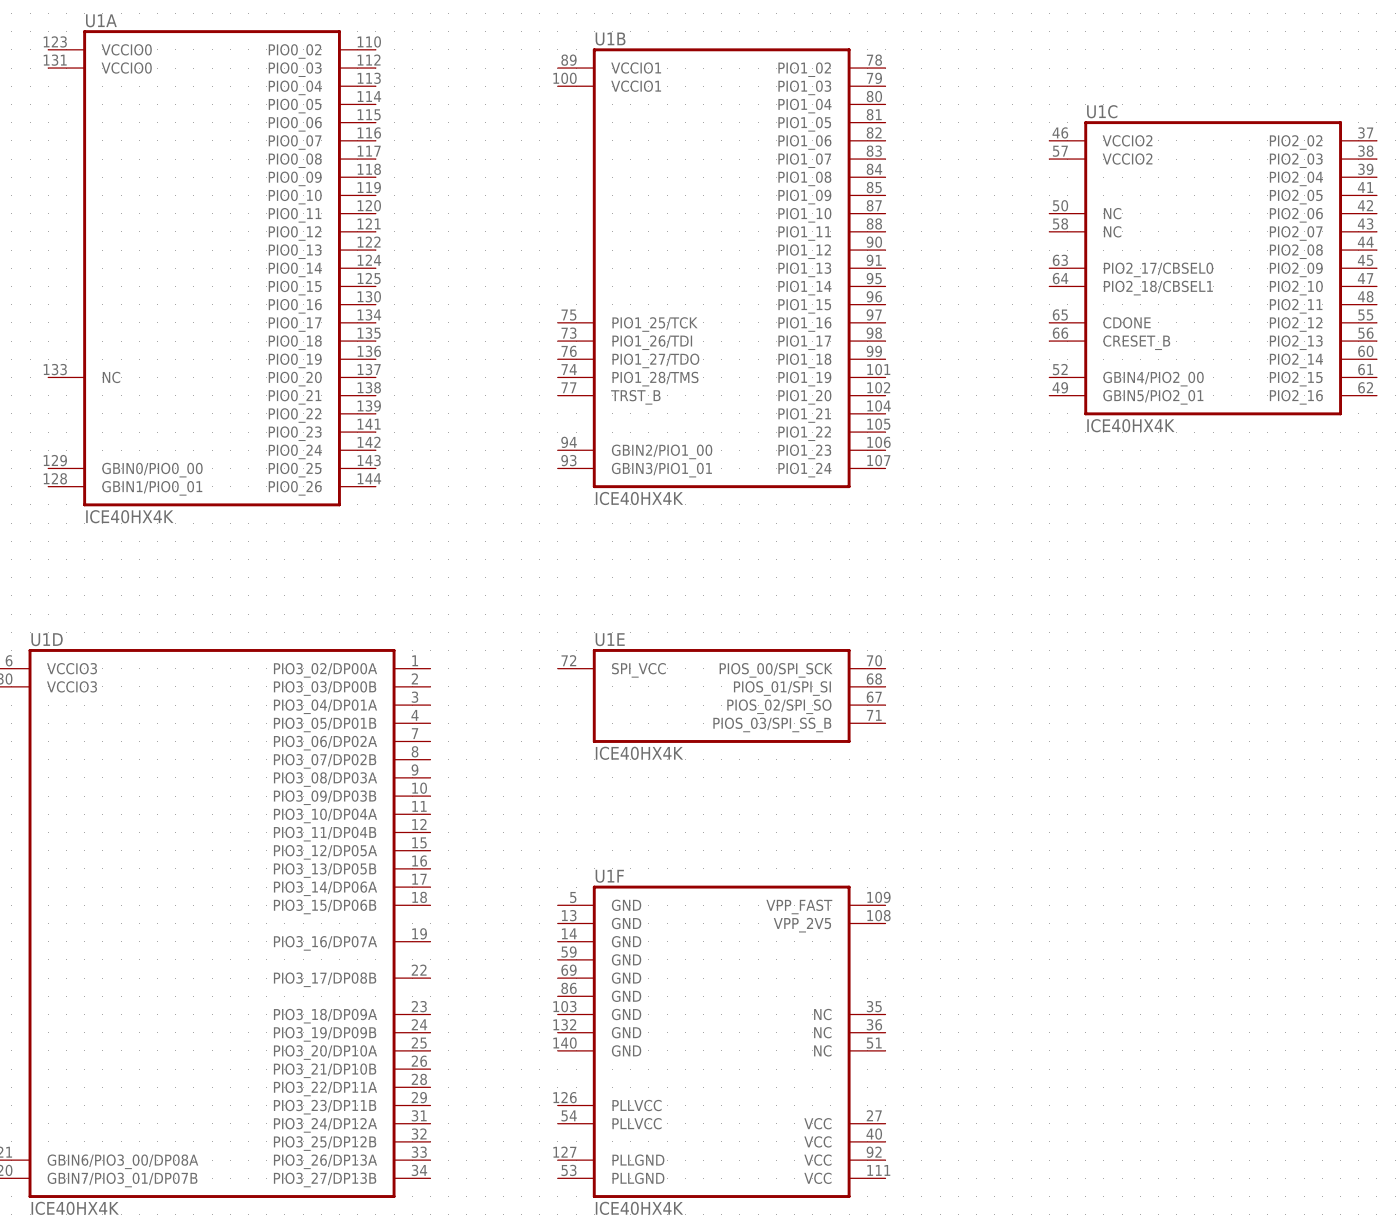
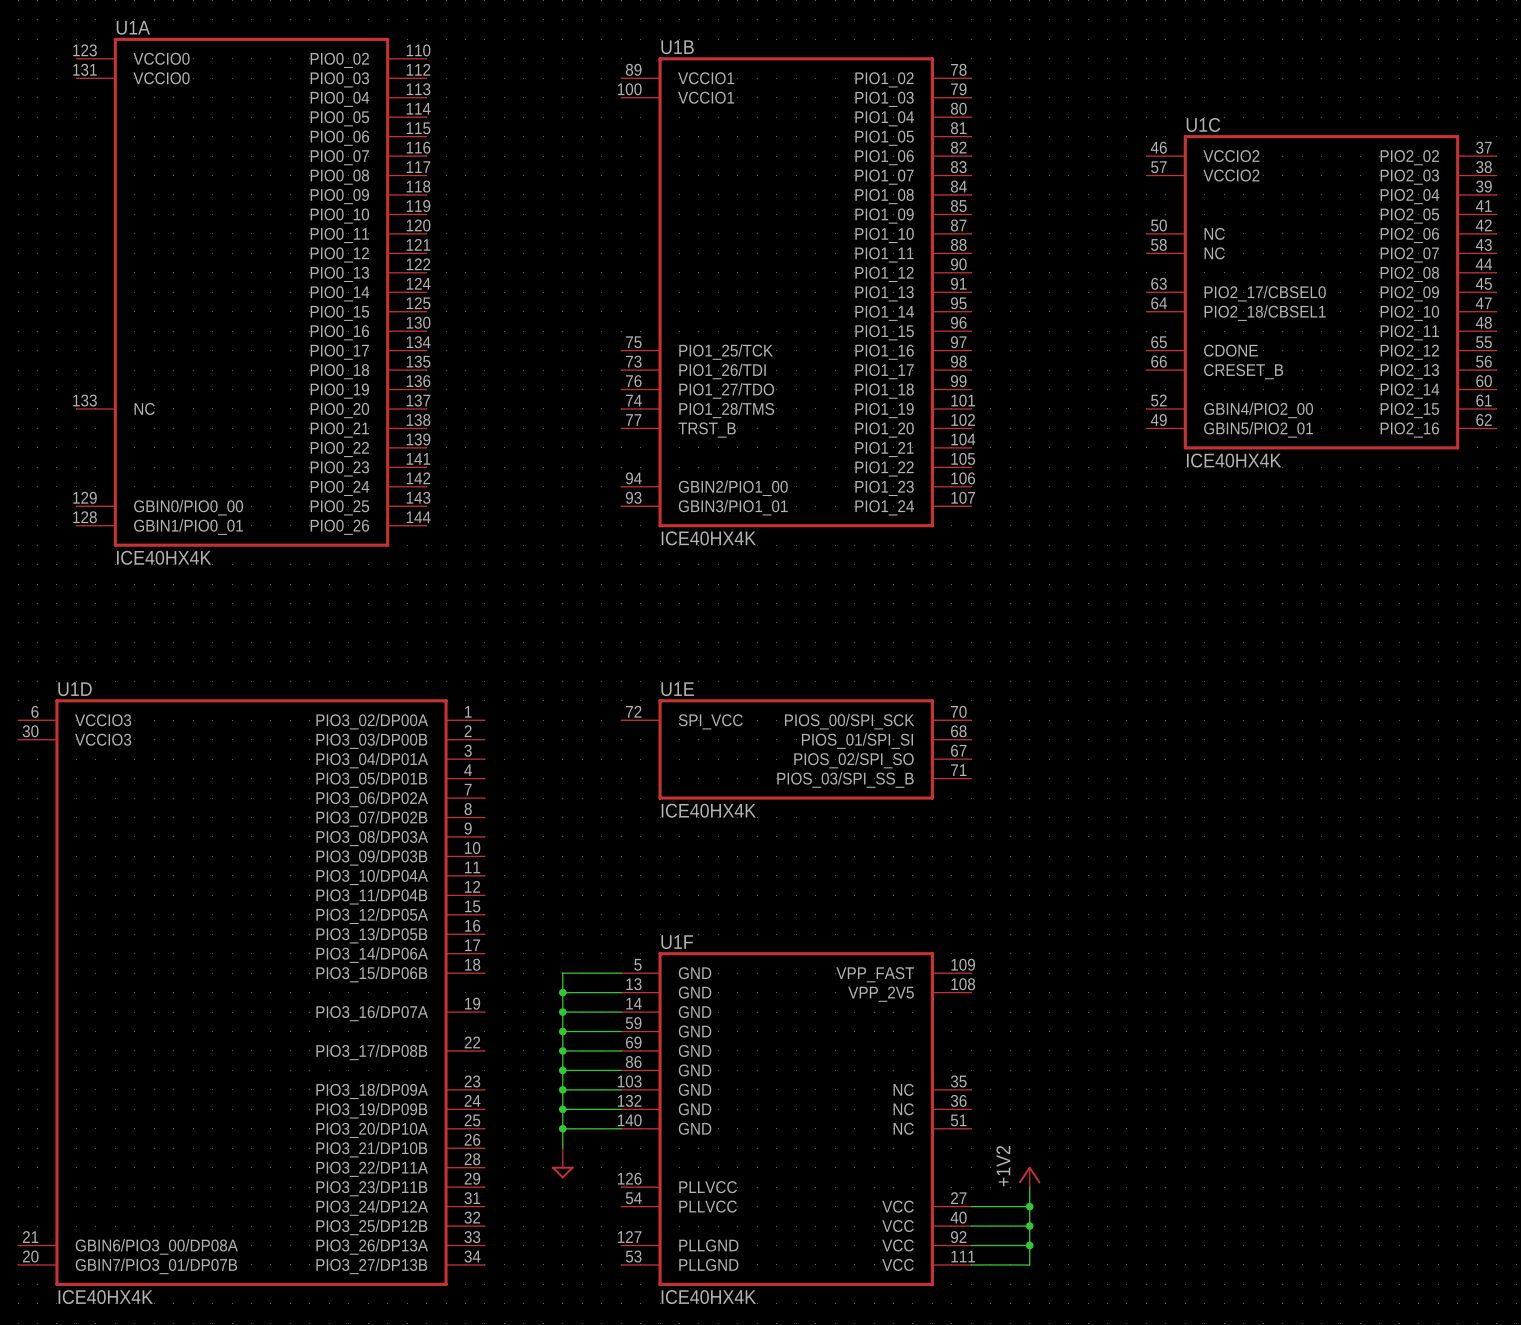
wire: none -> (621, 973) (562, 973) (562, 1148)
wire: none -> (562, 992) (621, 992)
junction: none -> (562, 992)
wire: none -> (562, 1012) (621, 1012)
junction: none -> (562, 1012)
wire: none -> (562, 1031) (621, 1031)
junction: none -> (562, 1031)
wire: none -> (562, 1050) (621, 1050)
junction: none -> (562, 1050)
wire: none -> (562, 1070) (621, 1070)
junction: none -> (562, 1070)
wire: none -> (562, 1089) (621, 1089)
junction: none -> (562, 1089)
wire: none -> (562, 1109) (621, 1109)
junction: none -> (562, 1109)
wire: none -> (562, 1128) (621, 1128)
junction: none -> (562, 1128)
power symbol: none -> (562, 1163)
power symbol: none -> +1V2 (1029, 1176)
wire: none -> (1029, 1187) (1029, 1264) (971, 1264)
wire: none -> (971, 1206) (1029, 1206)
junction: none -> (1029, 1206)
wire: none -> (971, 1226) (1029, 1226)
junction: none -> (1029, 1226)
wire: none -> (971, 1245) (1029, 1245)
junction: none -> (1029, 1245)

